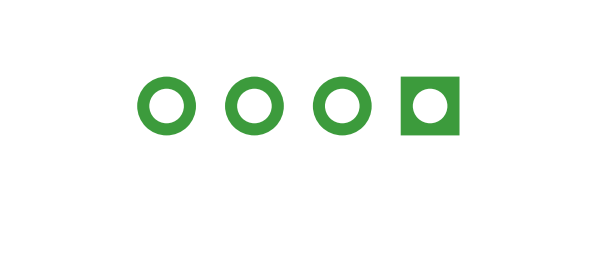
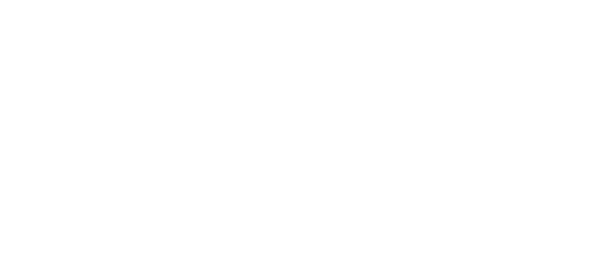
part: (298, 106) -> none

